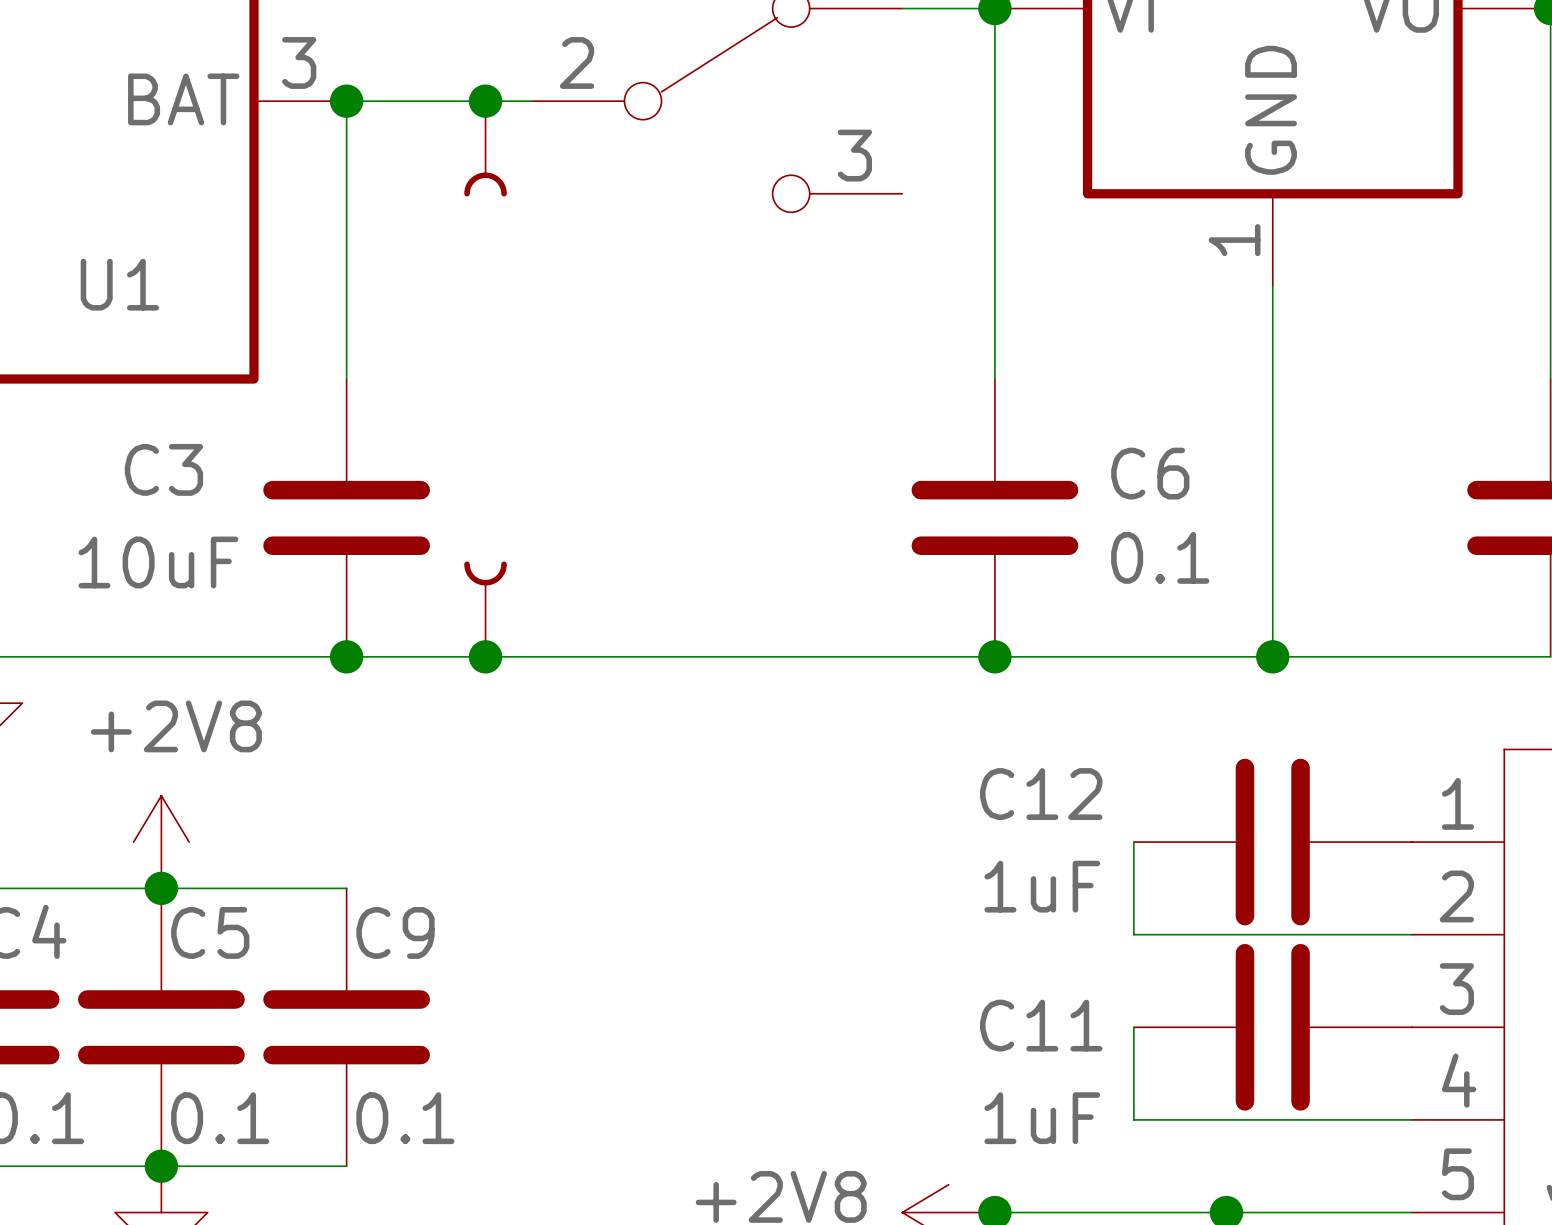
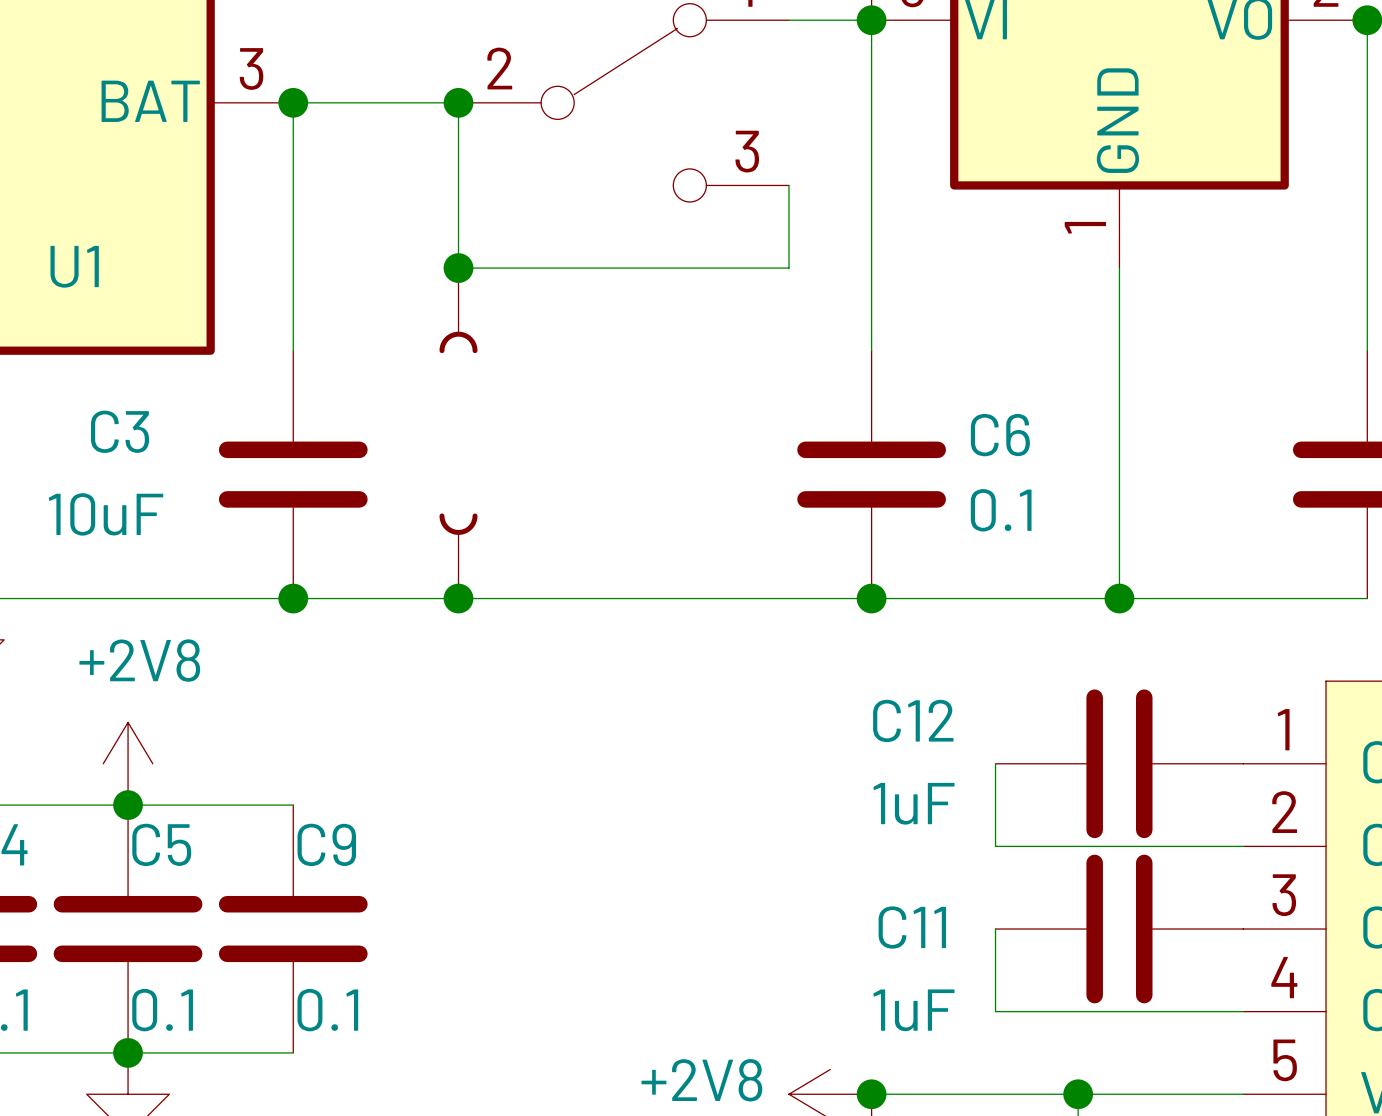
junction position: (485, 101) -> (458, 102)
wire: none -> (458, 102) (458, 268) (788, 268) (788, 185)
part: (485, 148) -> none
junction: none -> (458, 268)
part: none -> (458, 310)
part position: (485, 609) -> (458, 556)
junction position: (485, 656) -> (458, 598)

